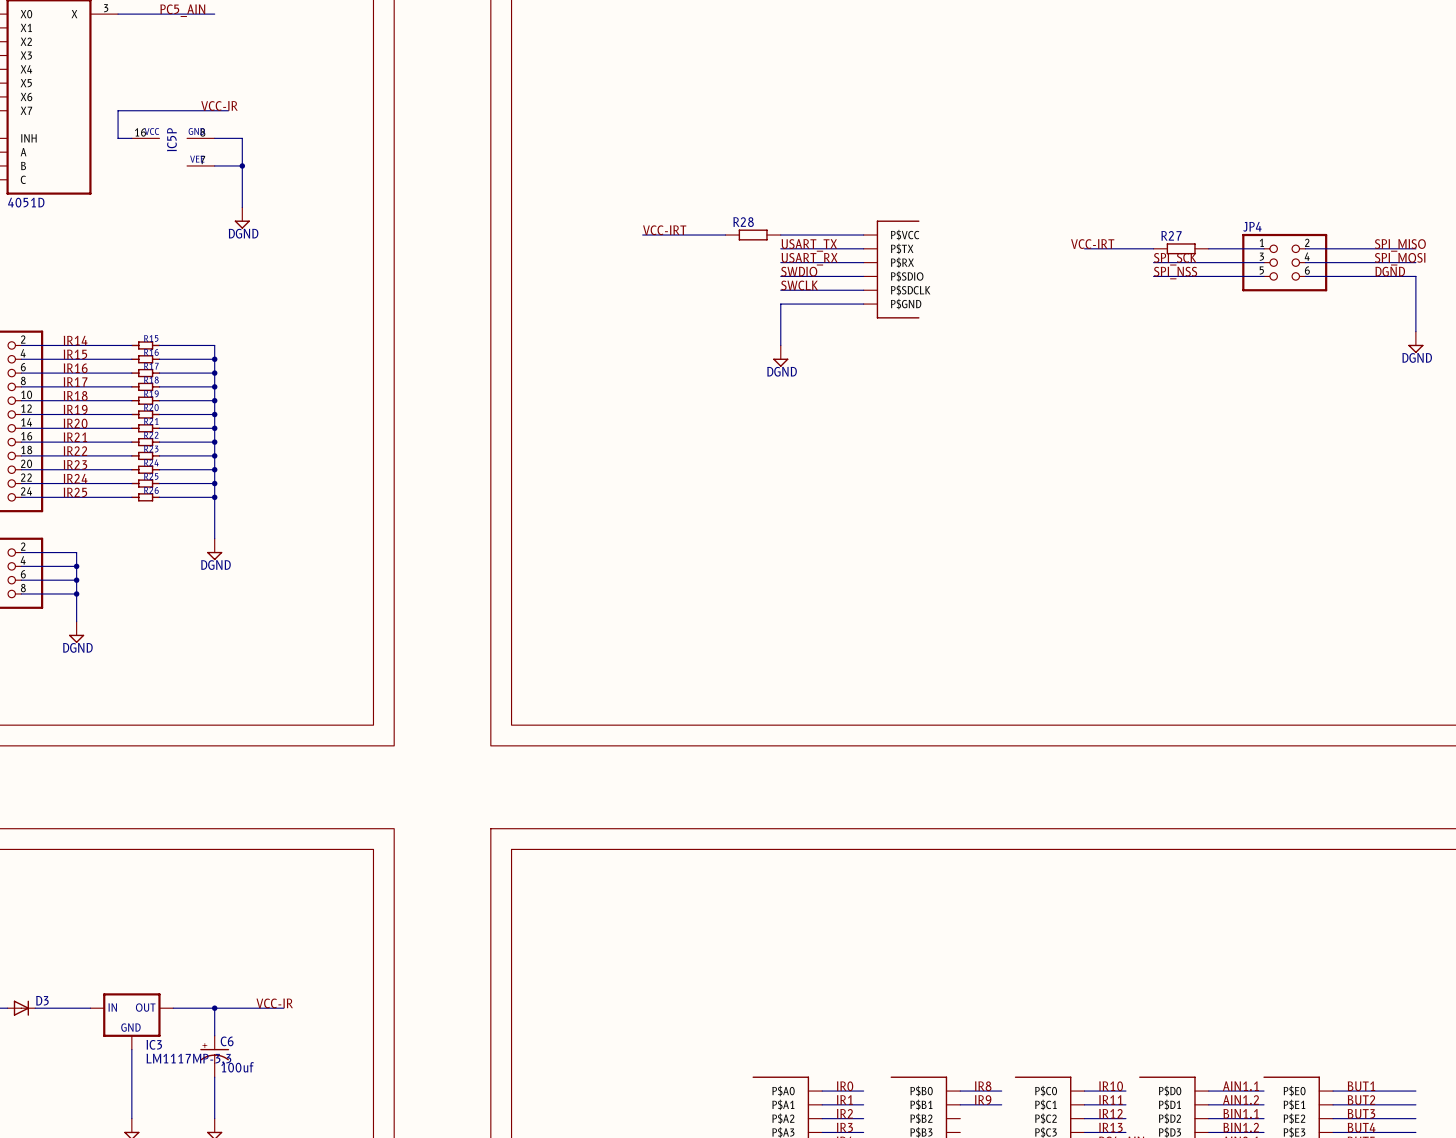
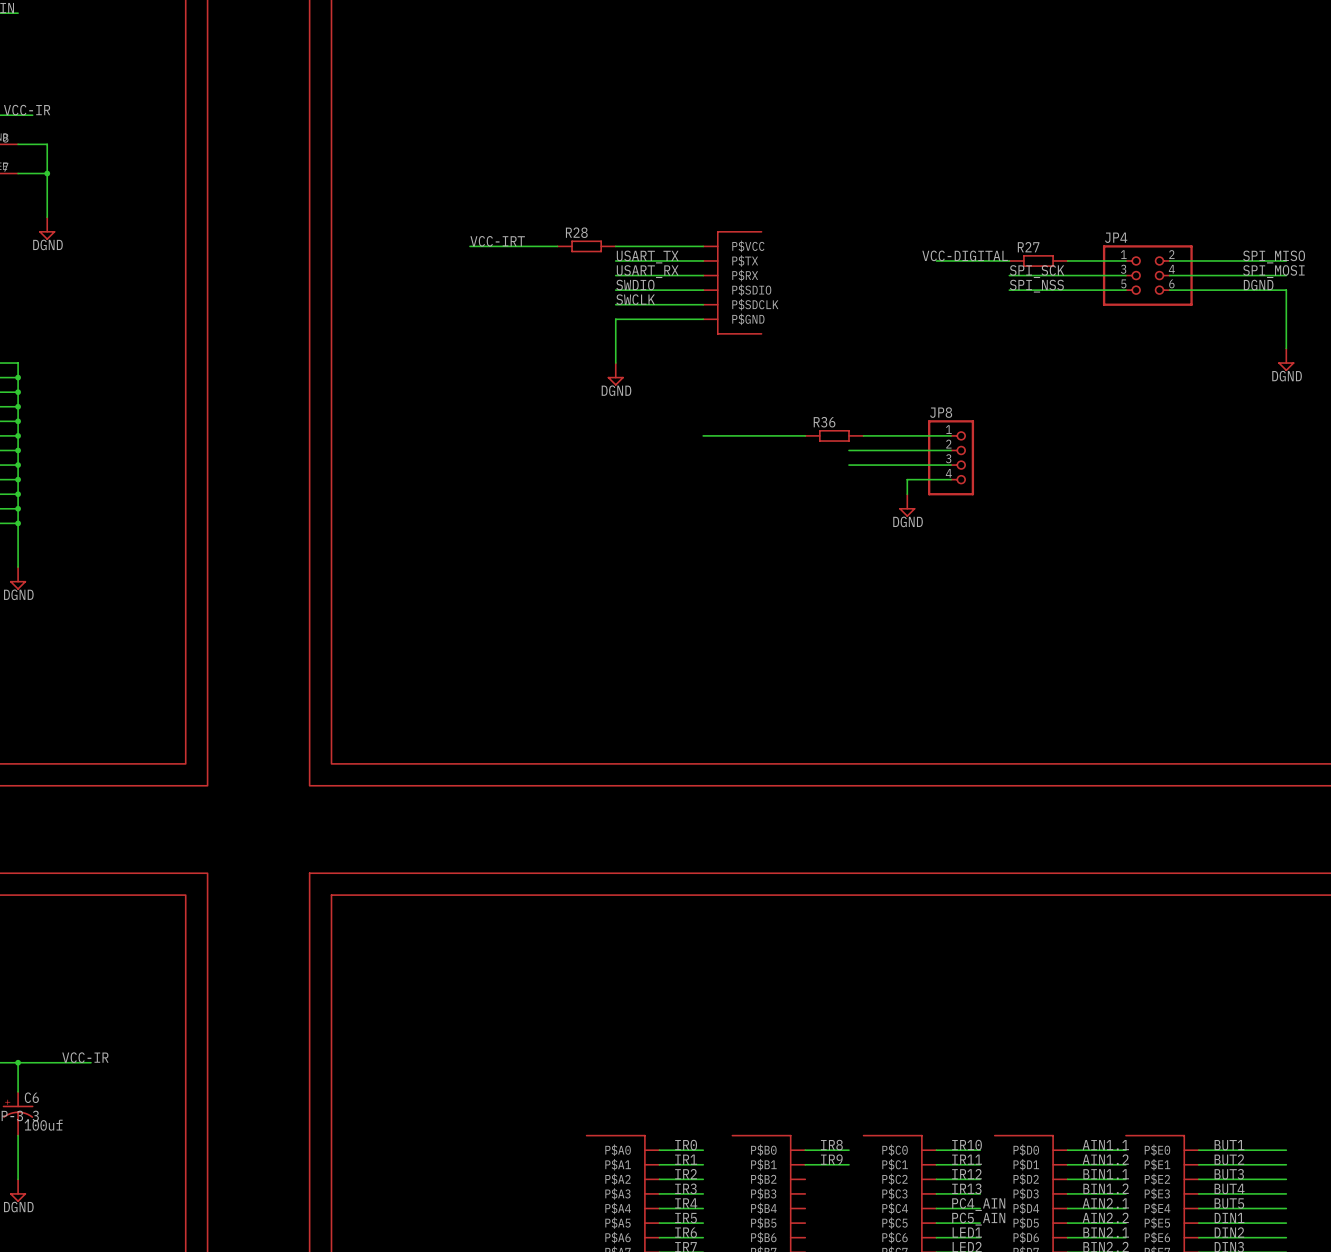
label: VCC-IRT (1092, 244) -> VCC-DIGITAL (965, 255)
wire: none -> (703, 435) (805, 435)
R36: none -> (834, 435)
wire: none -> (863, 435) (951, 435)
wire: none -> (848, 450) (951, 450)
JP8: none -> (951, 457)
wire: none -> (848, 465) (951, 465)
wire: none -> (951, 479) (907, 479) (907, 494)
power symbol: none -> DGND (907, 505)

